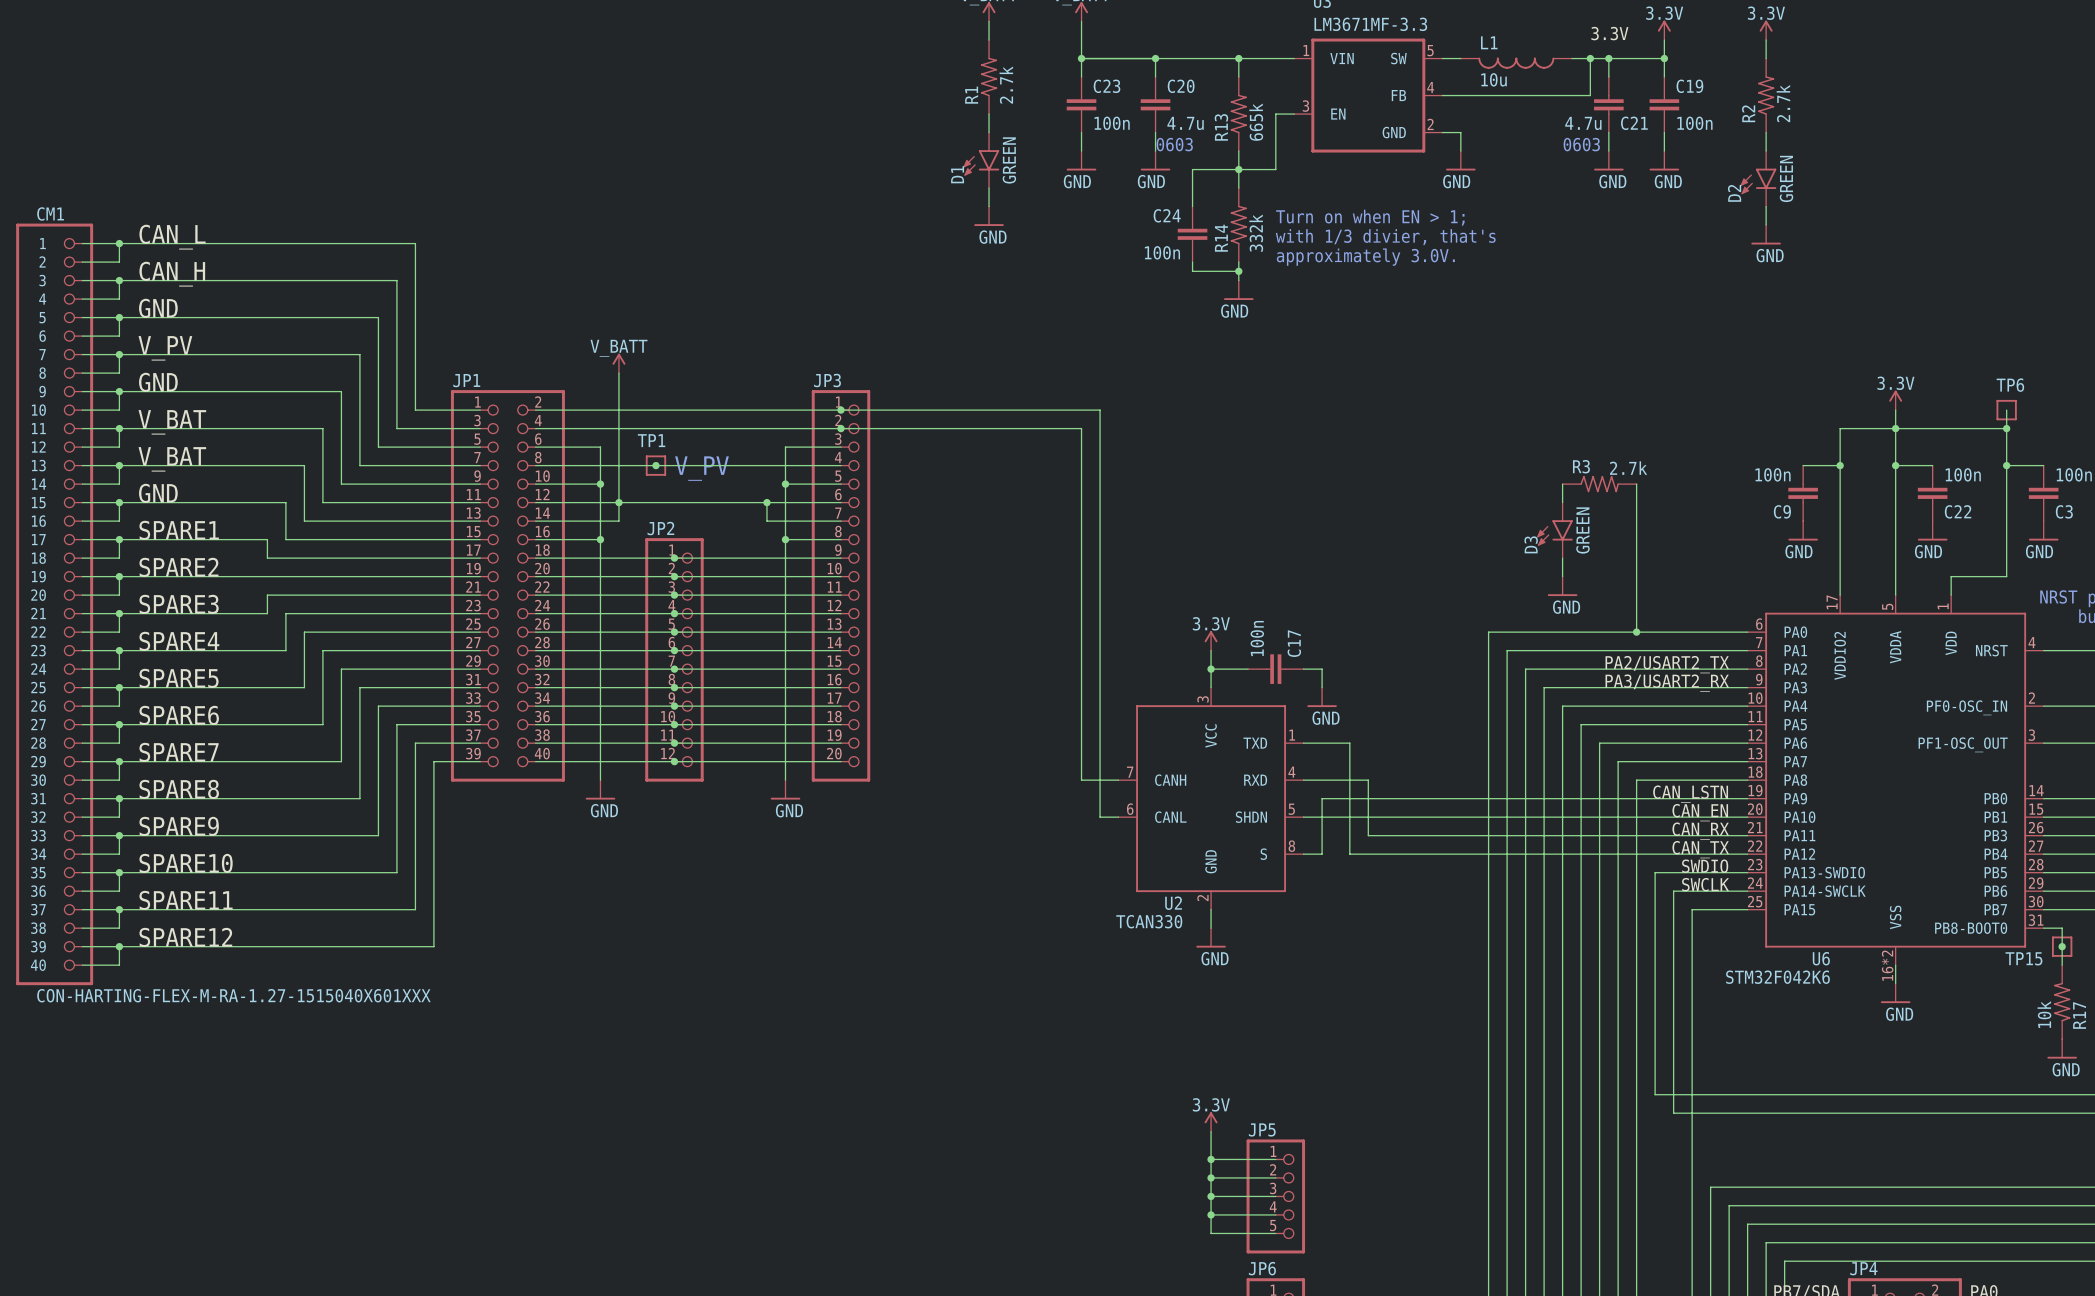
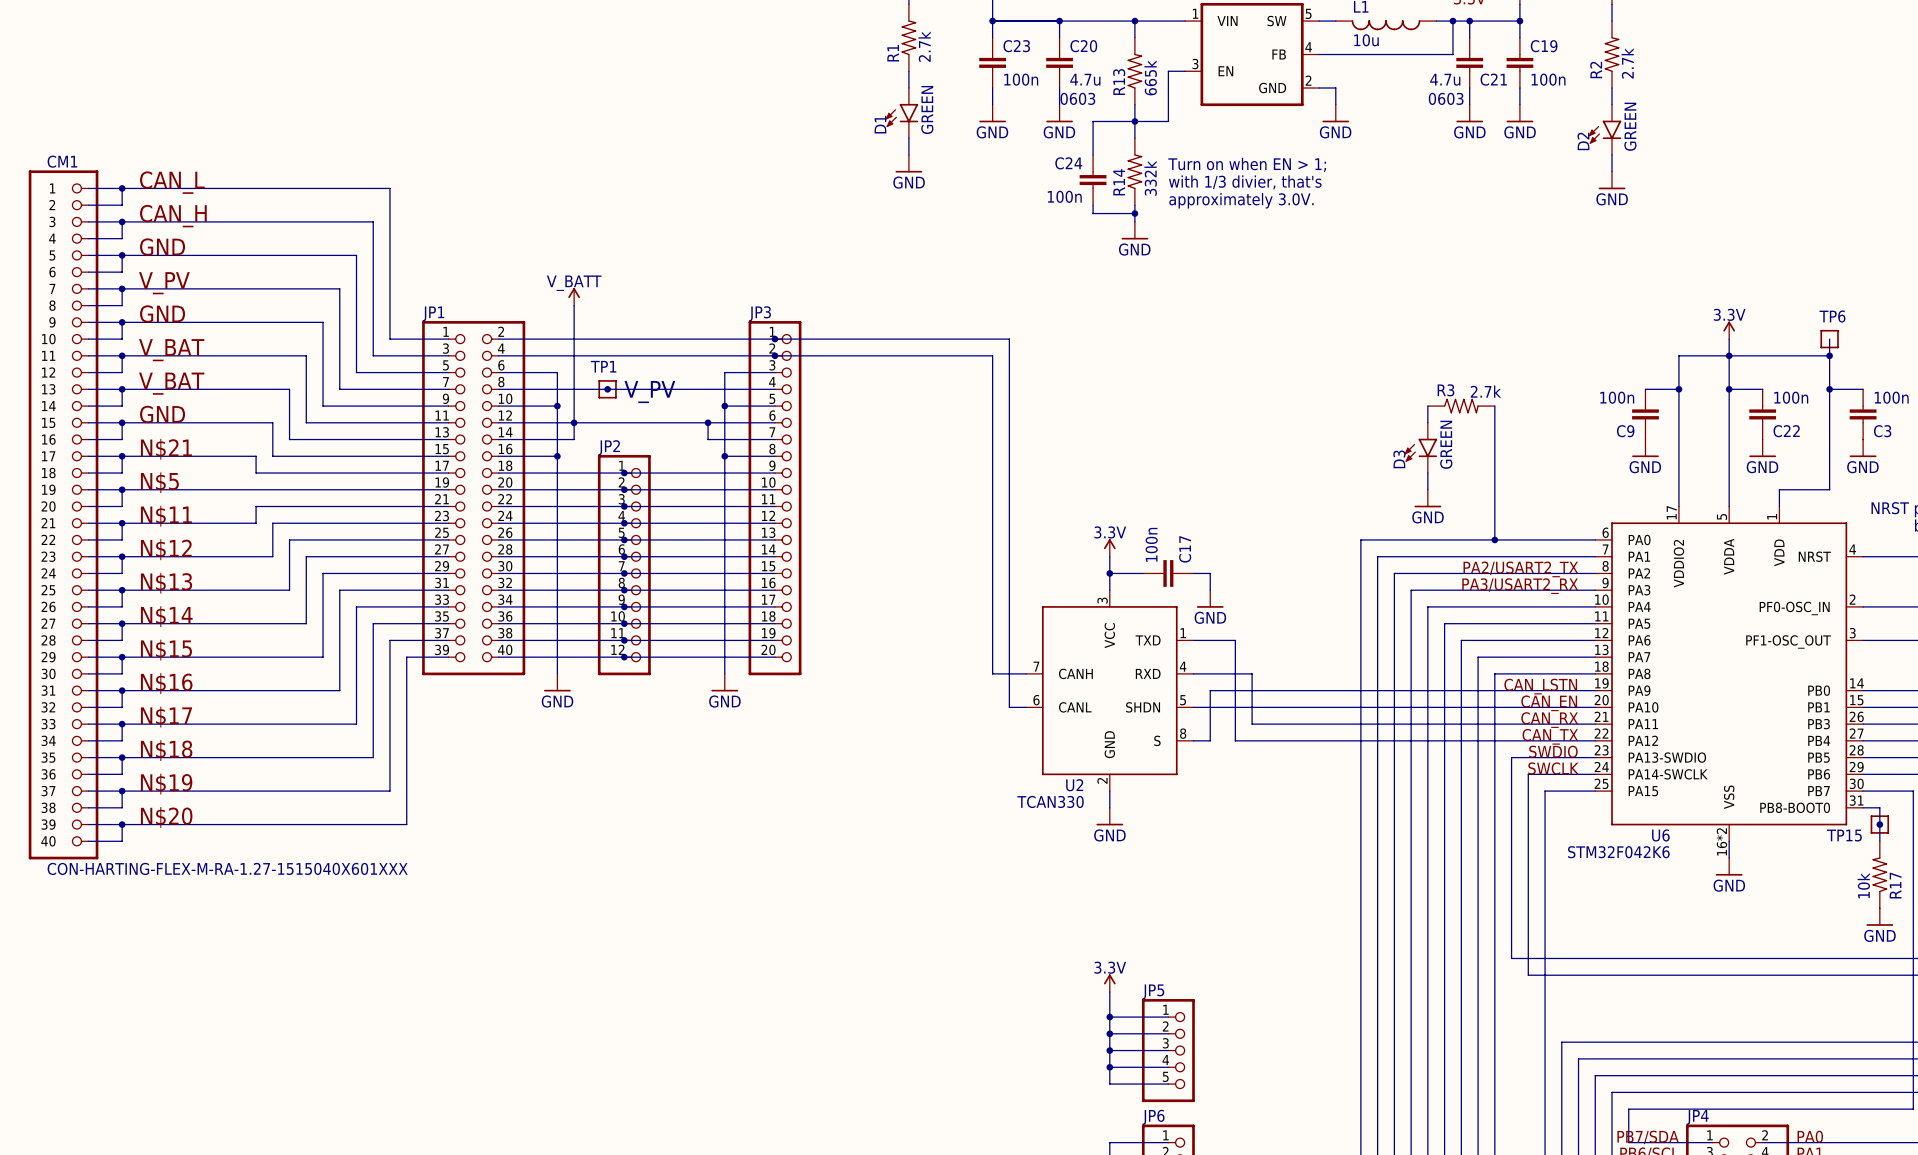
label: SPARE1 (179, 530) -> N$21 (166, 449)
label: SPARE2 (178, 567) -> N$5 (159, 482)
label: SPARE3 (179, 604) -> N$11 (166, 516)
label: SPARE4 (179, 641) -> N$12 (166, 549)
label: SPARE5 (179, 678) -> N$13 (166, 583)
label: SPARE6 (179, 715) -> N$14 (166, 616)
label: SPARE7 (179, 752) -> N$15 (166, 650)
label: SPARE8 (179, 789) -> N$16 (166, 683)
label: SPARE9 (179, 826) -> N$17 (166, 717)
label: SPARE10 (186, 863) -> N$18 (166, 750)
label: SPARE11 (186, 900) -> N$19 (166, 784)
label: SPARE12 (185, 937) -> N$20 (166, 817)

